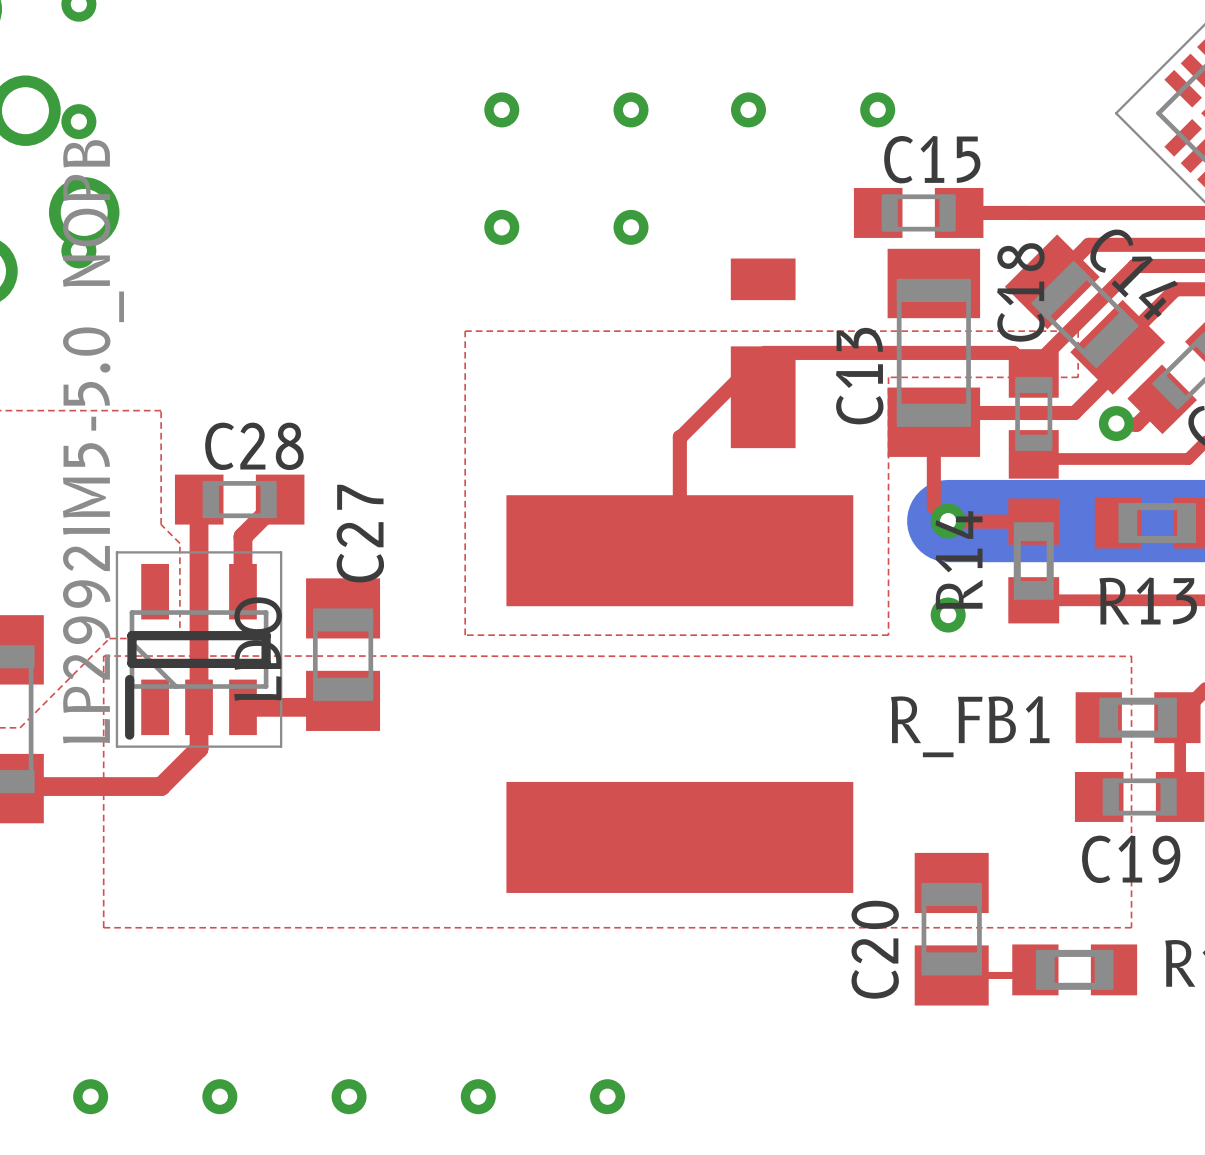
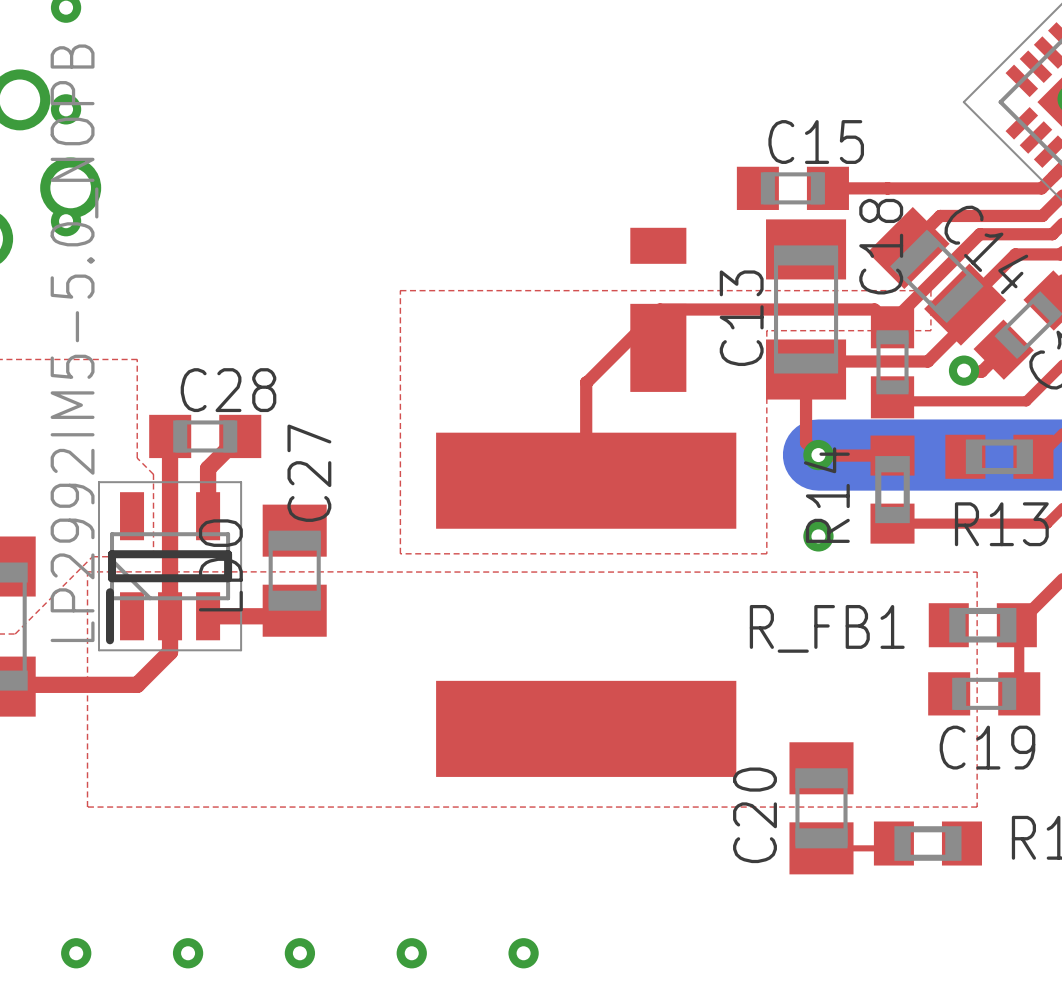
via: (501, 109) -> none
via: (631, 109) -> none
via: (748, 109) -> none
via: (877, 109) -> none
via: (501, 227) -> none
via: (631, 227) -> none

